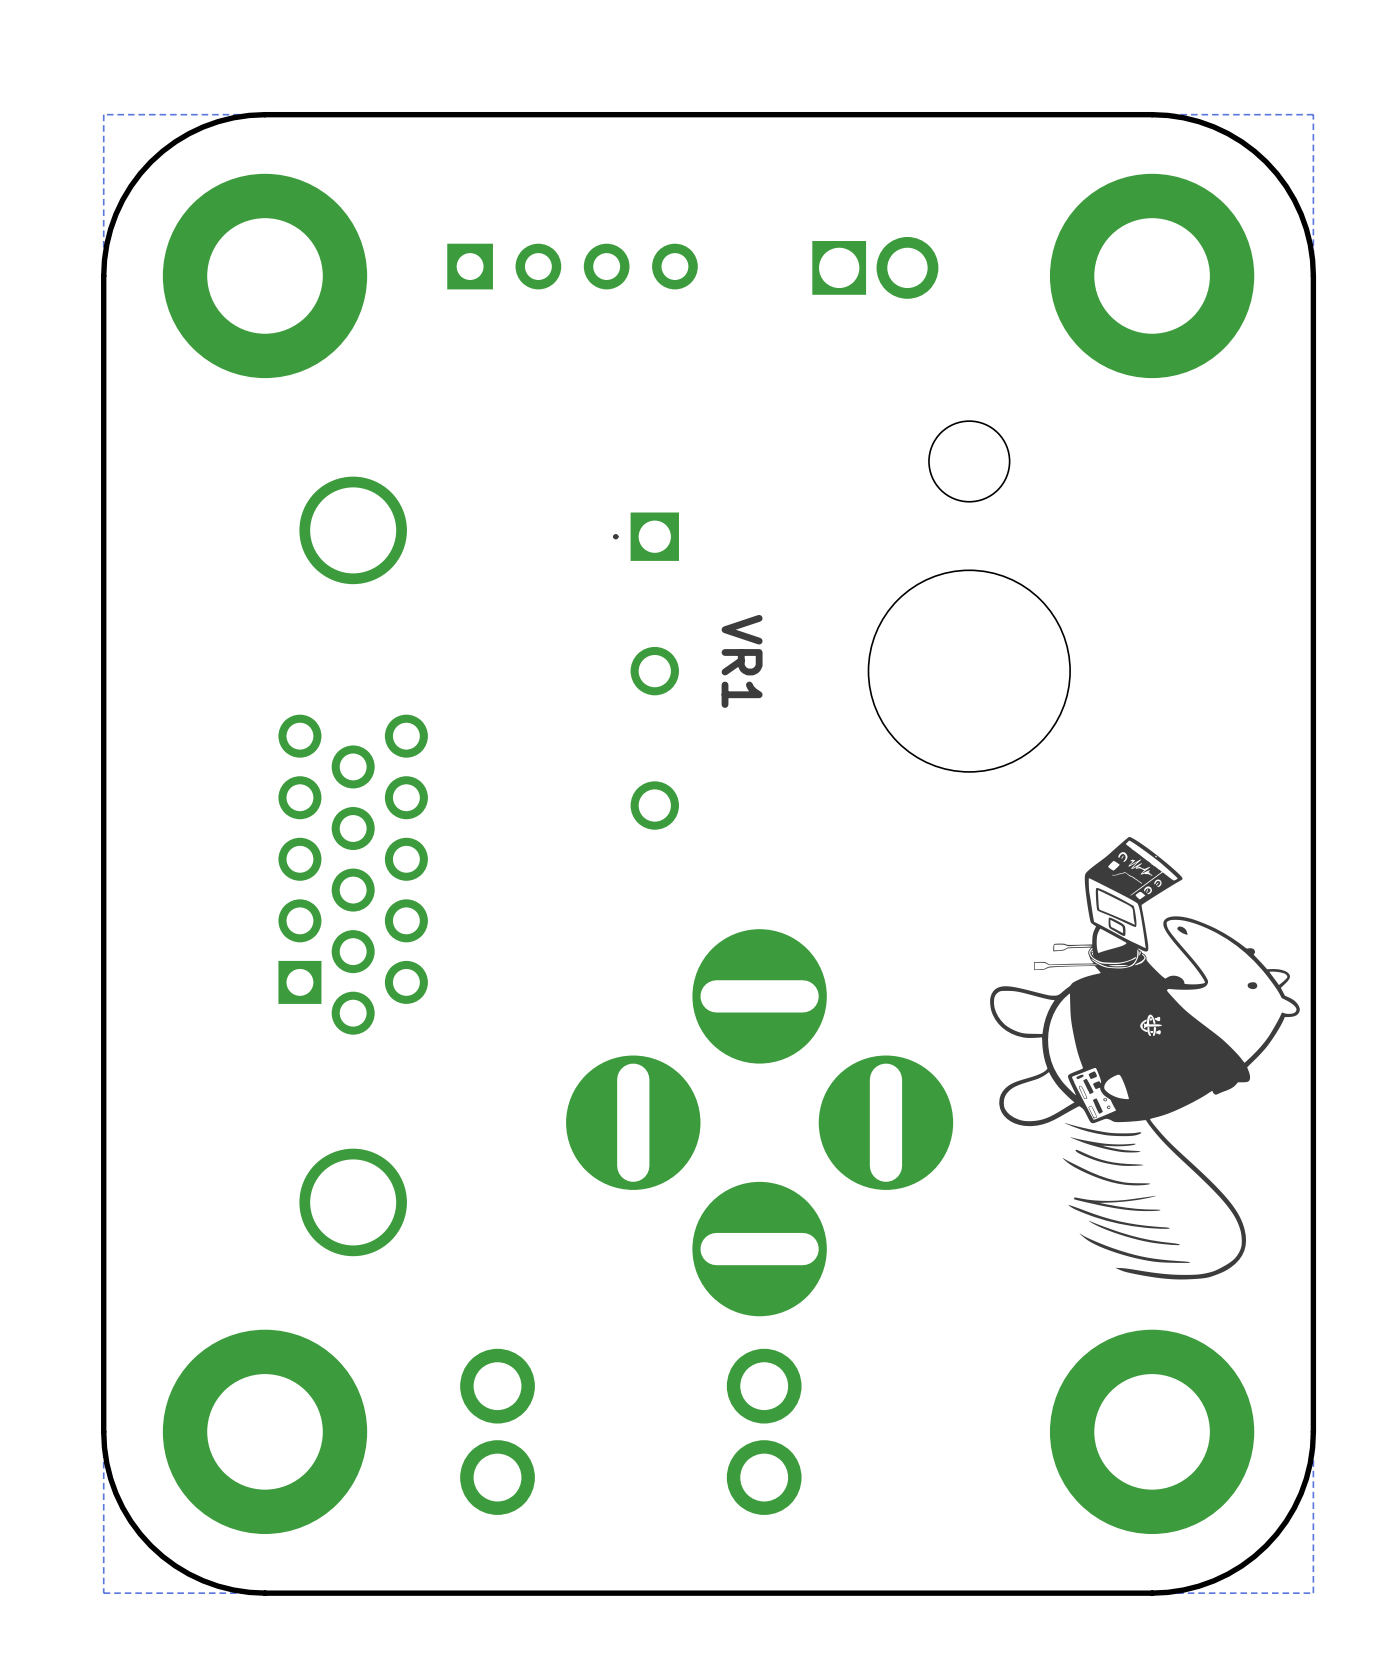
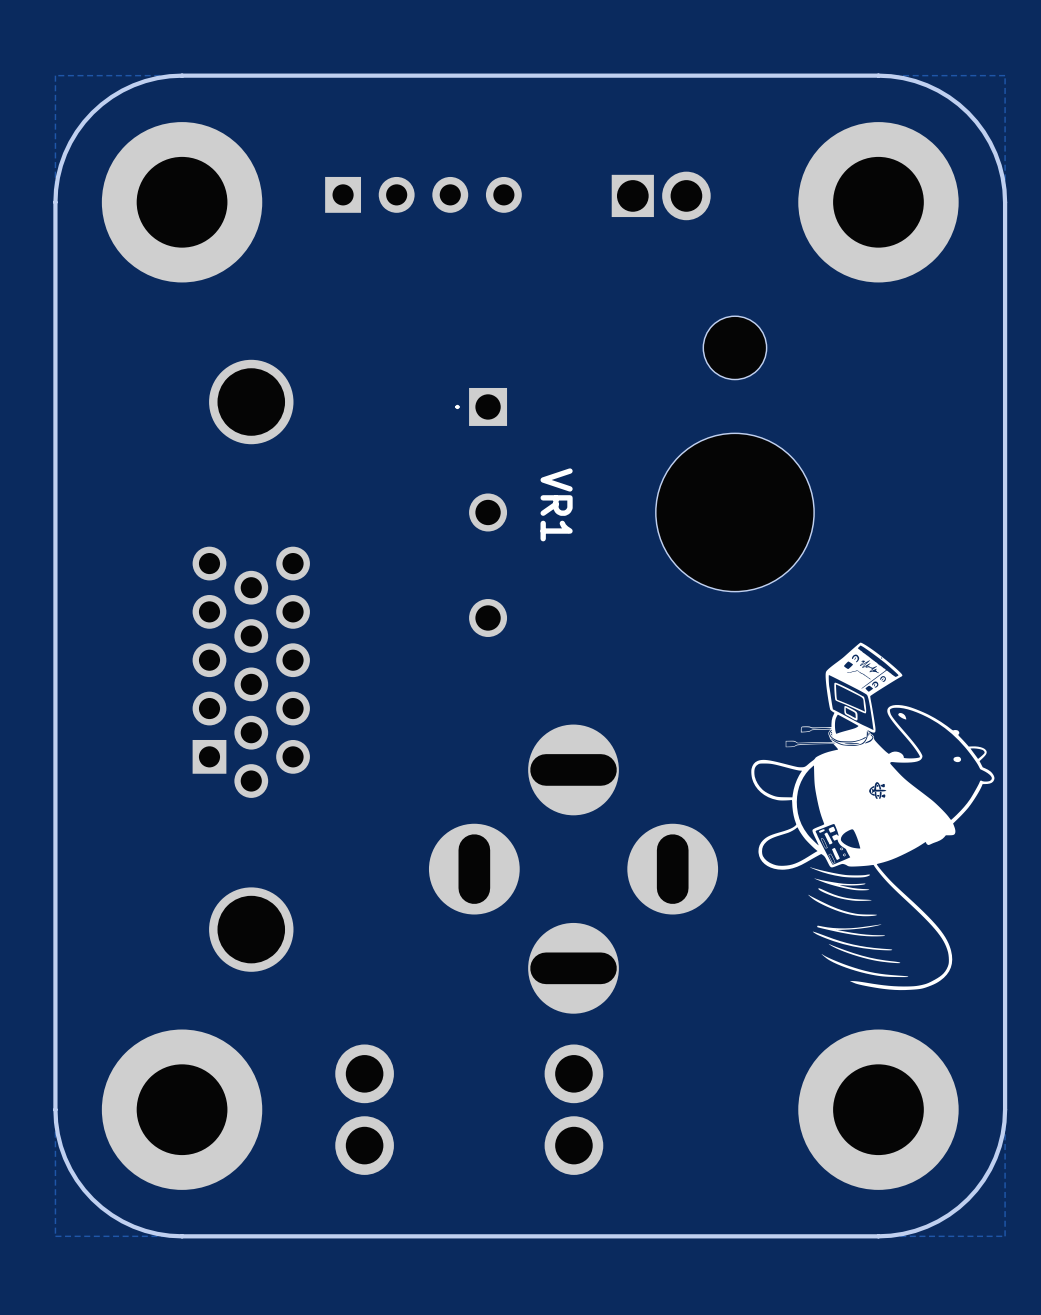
part footprint: [566, 929, 954, 1317] -> [428, 724, 719, 1014]

